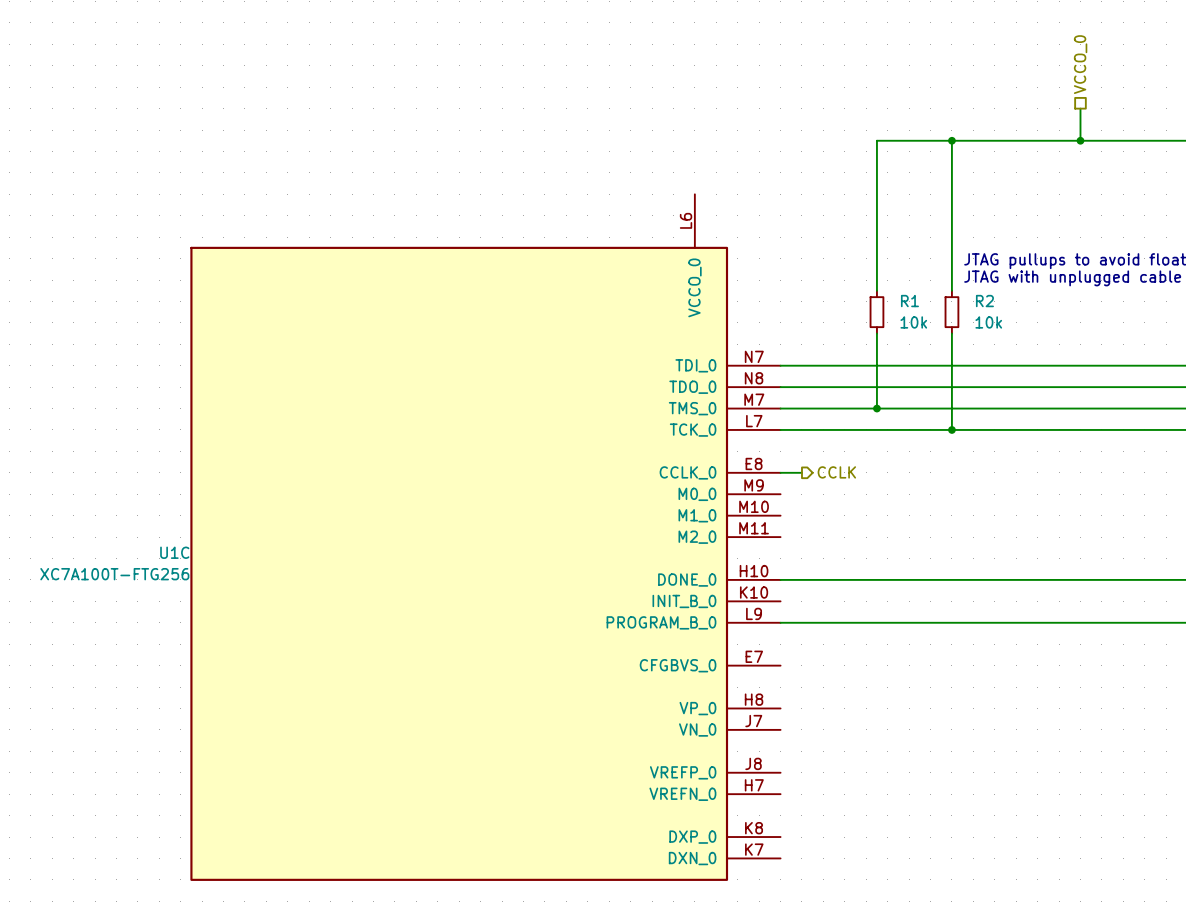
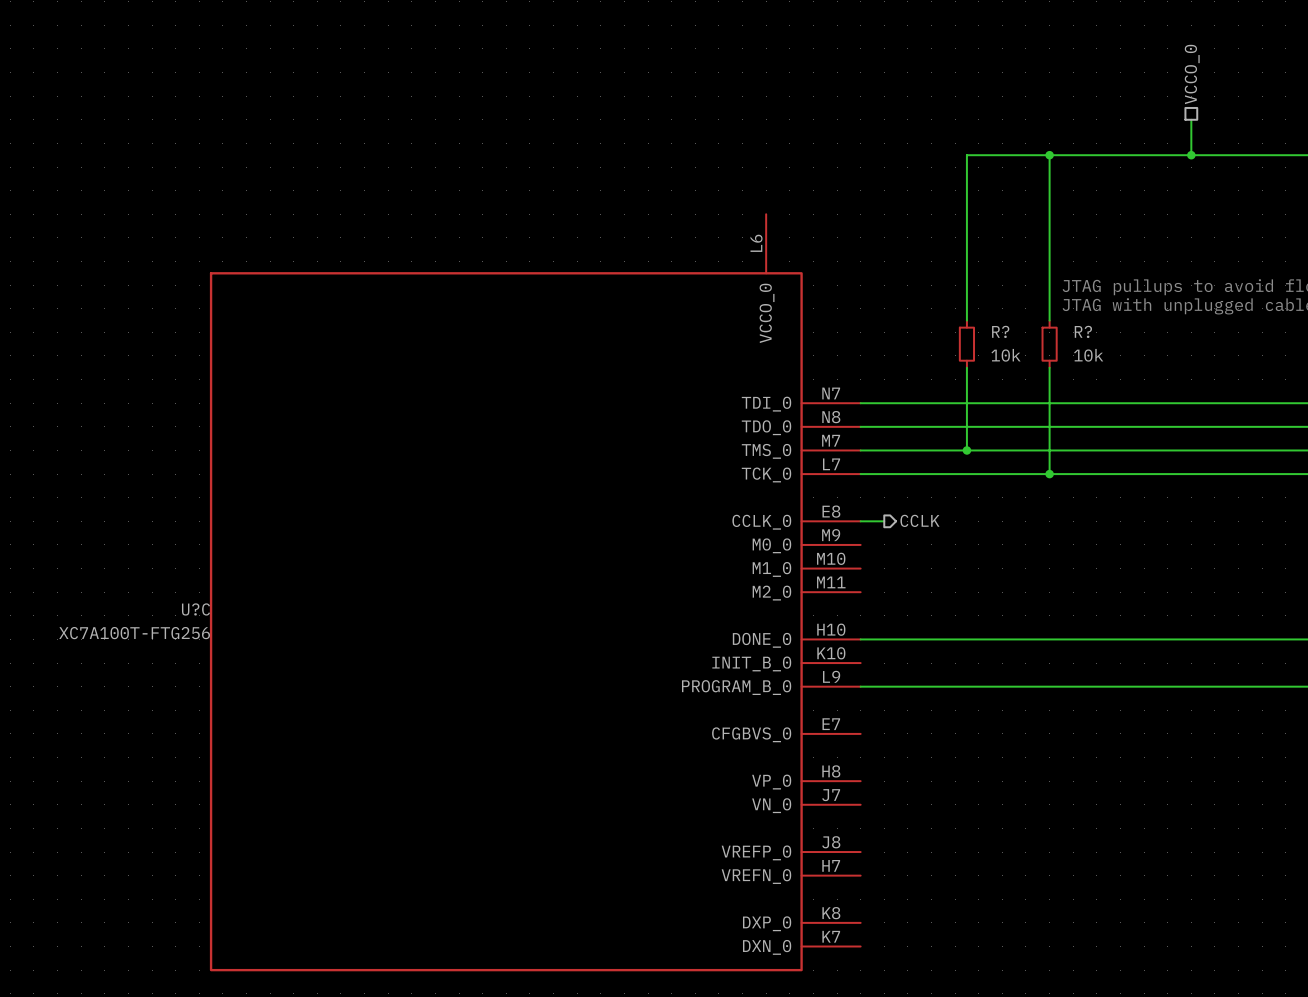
R1 name: R1 (909, 301) -> R? (1000, 331)
R2 name: R2 (984, 301) -> R? (1083, 331)
U1C name: U1C (174, 552) -> U?C (195, 609)

